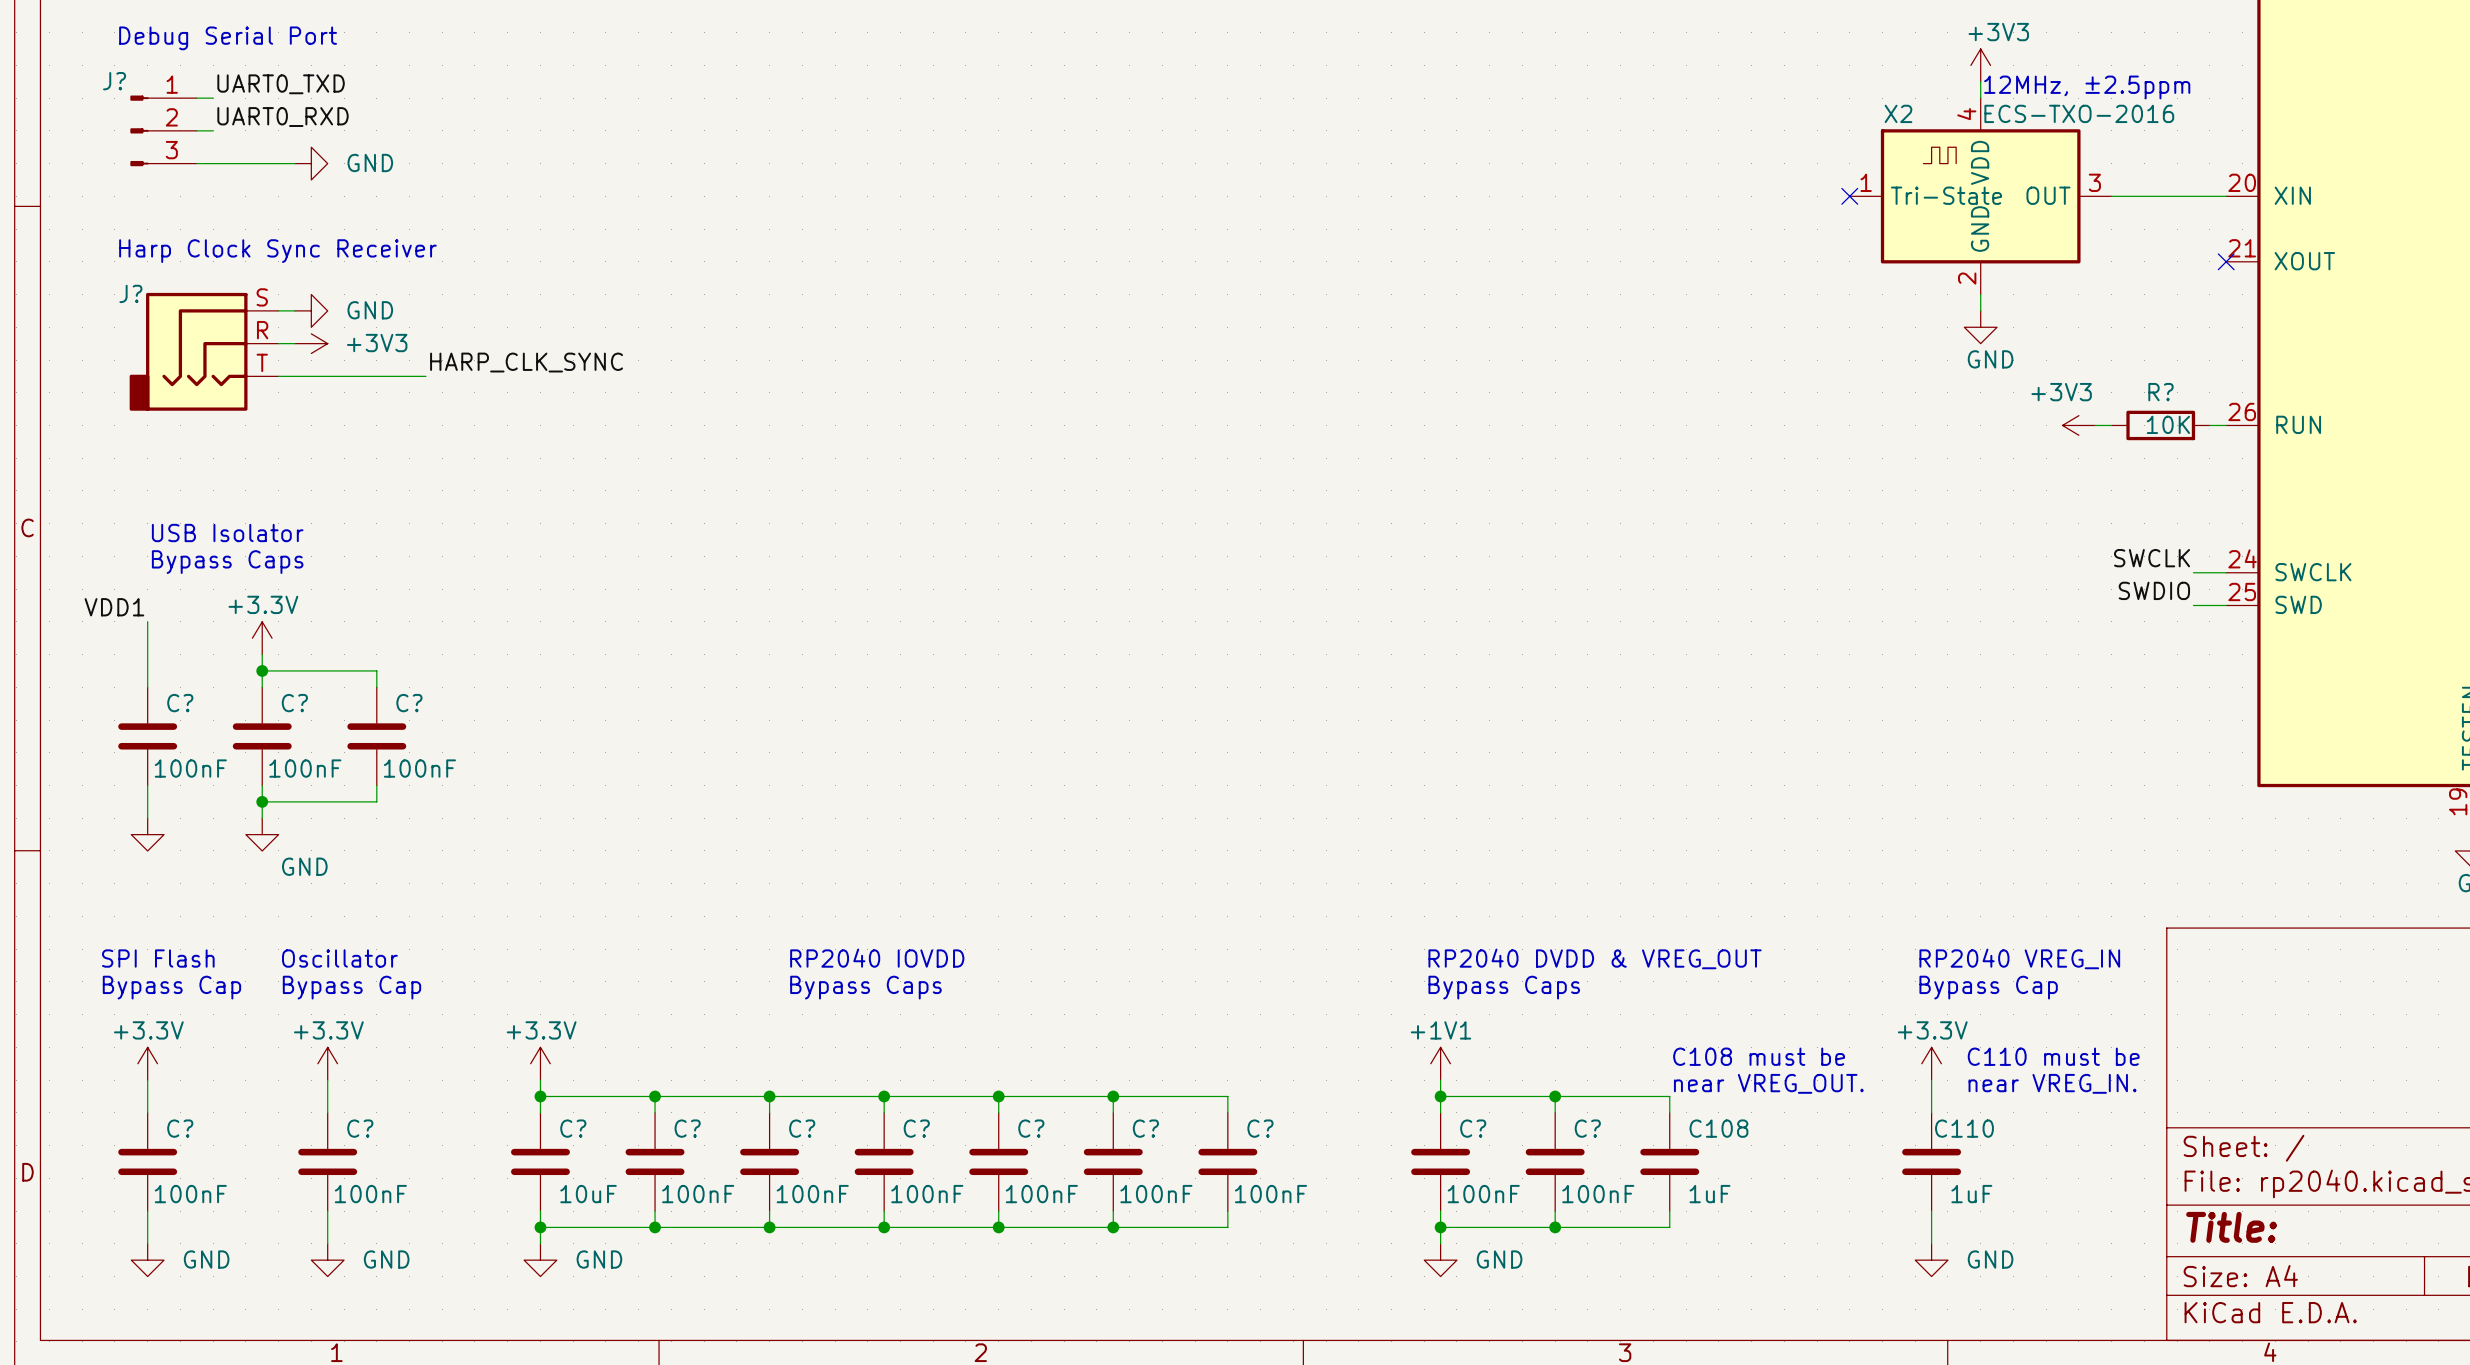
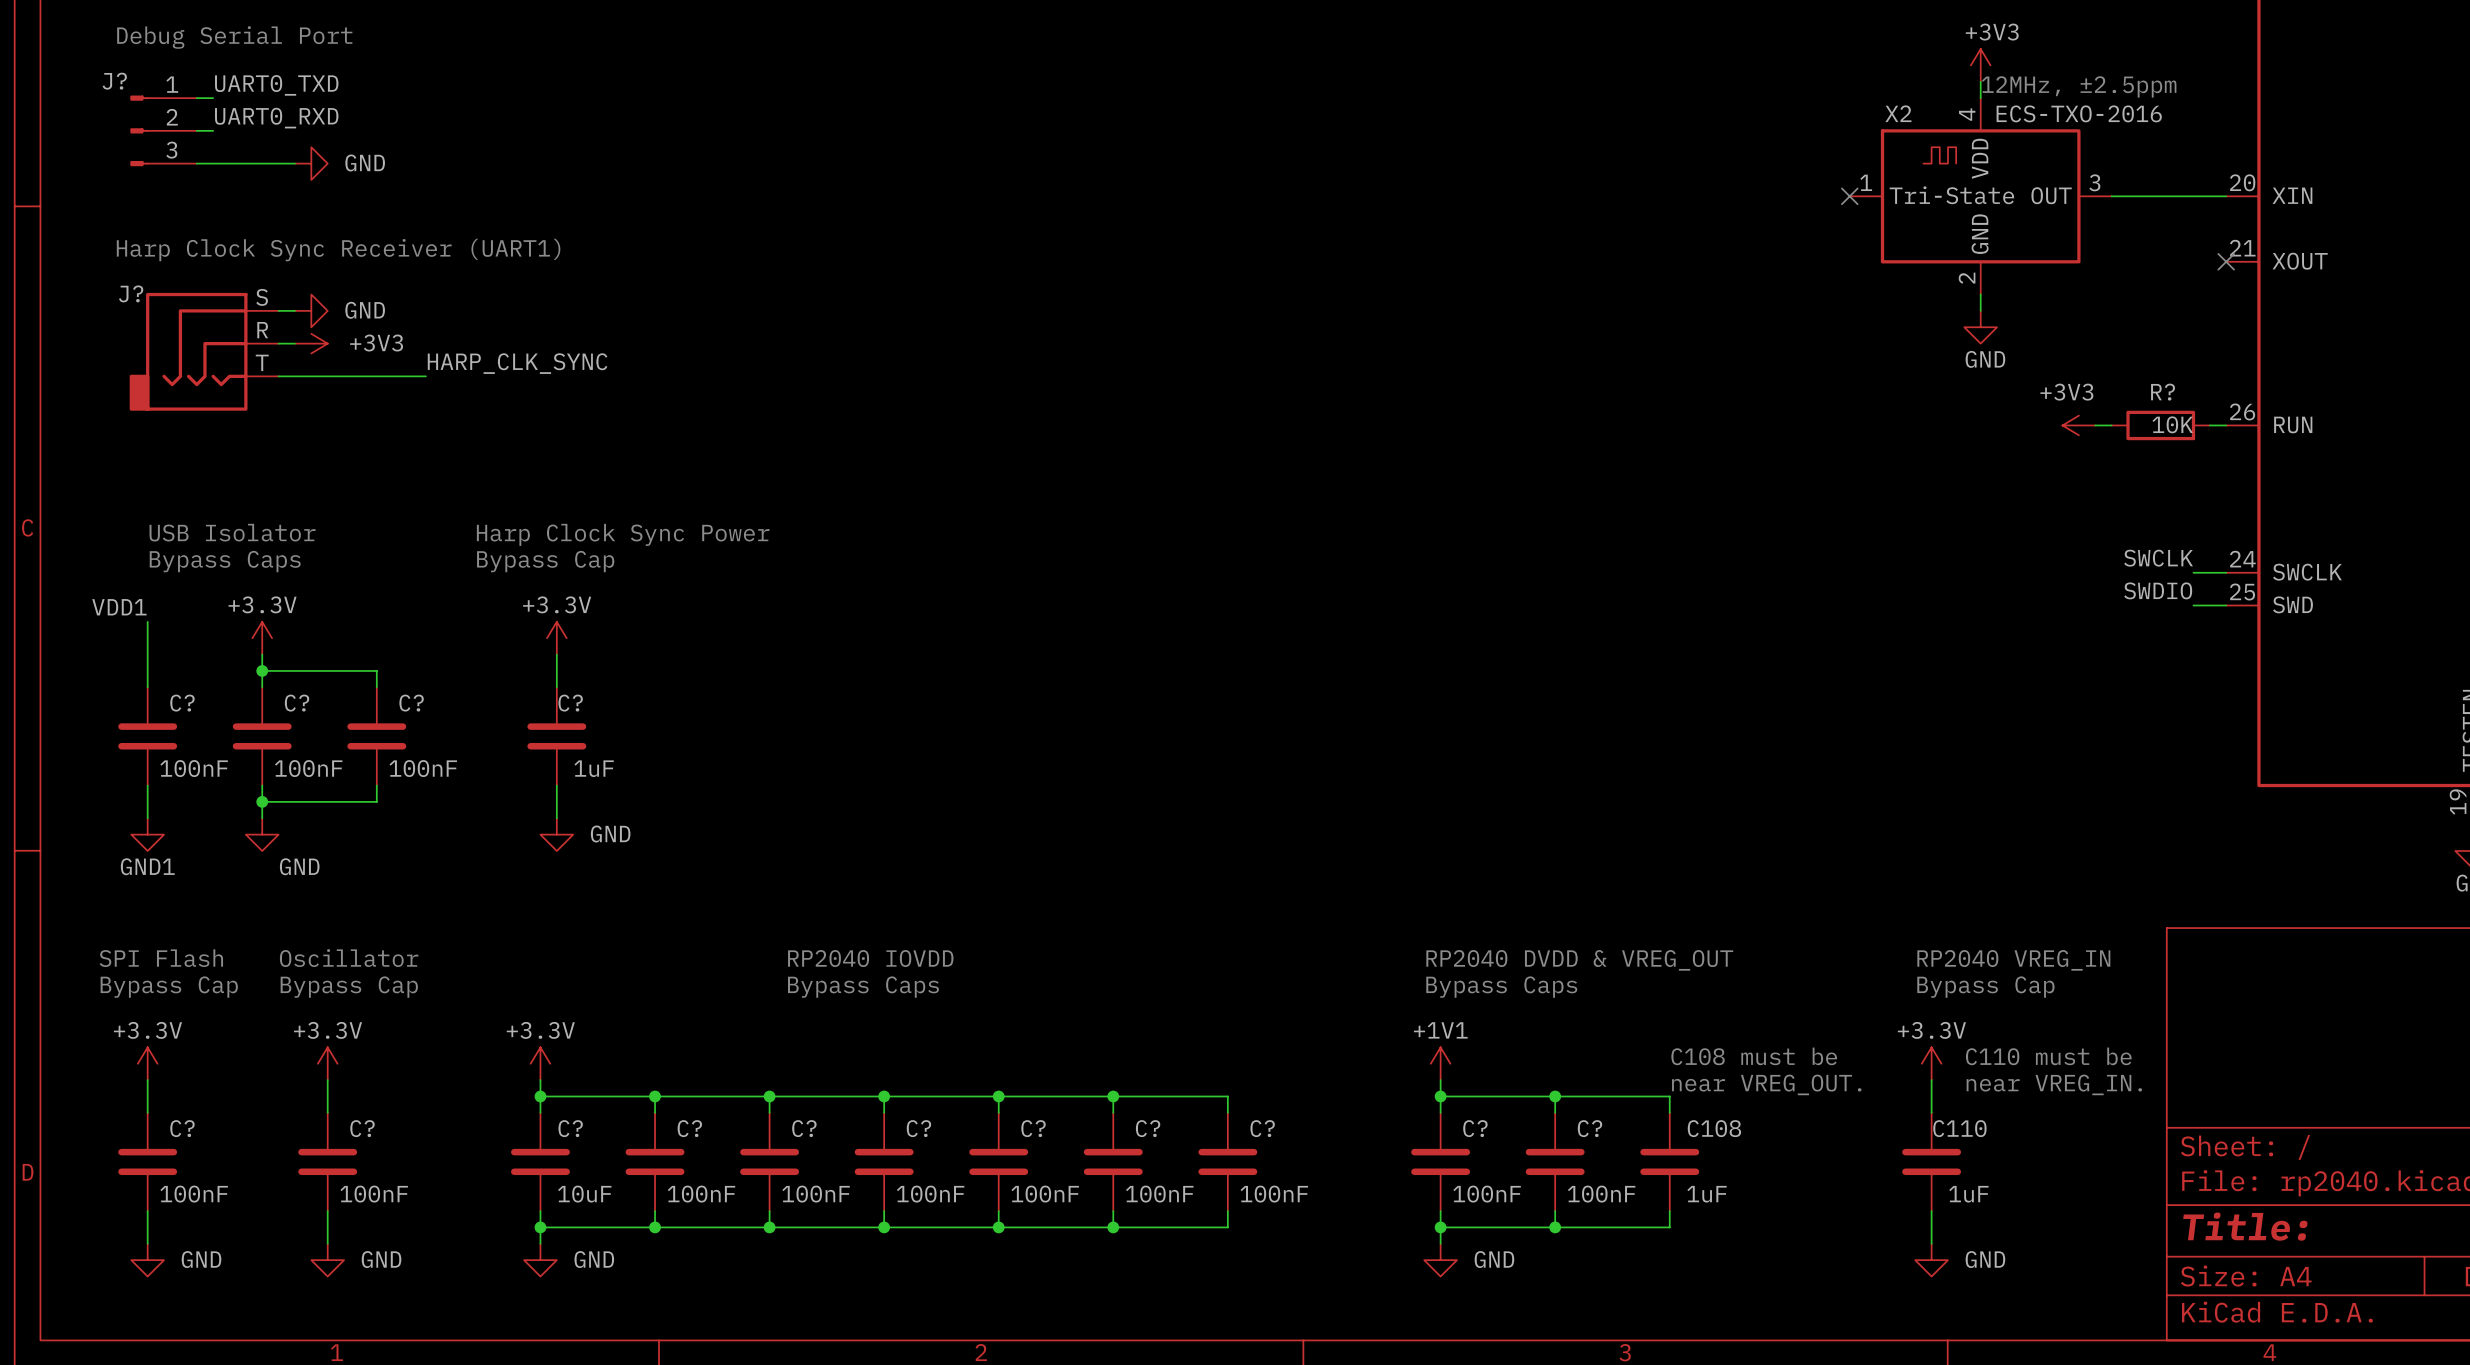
text: Harp Clock Sync Receiver (277, 251) -> Harp Clock Sync Receiver (UART1) (338, 250)
text: none -> Harp Clock Sync Power (623, 534)
text: none -> Bypass Cap (545, 561)
power symbol: none -> +3.3V (556, 638)
wire: none -> (556, 654) (556, 687)
C?: none -> 1uF (556, 736)
wire: none -> (556, 785) (556, 818)
power symbol: none -> GND (556, 834)
power symbol text: none -> GND1 (147, 866)

